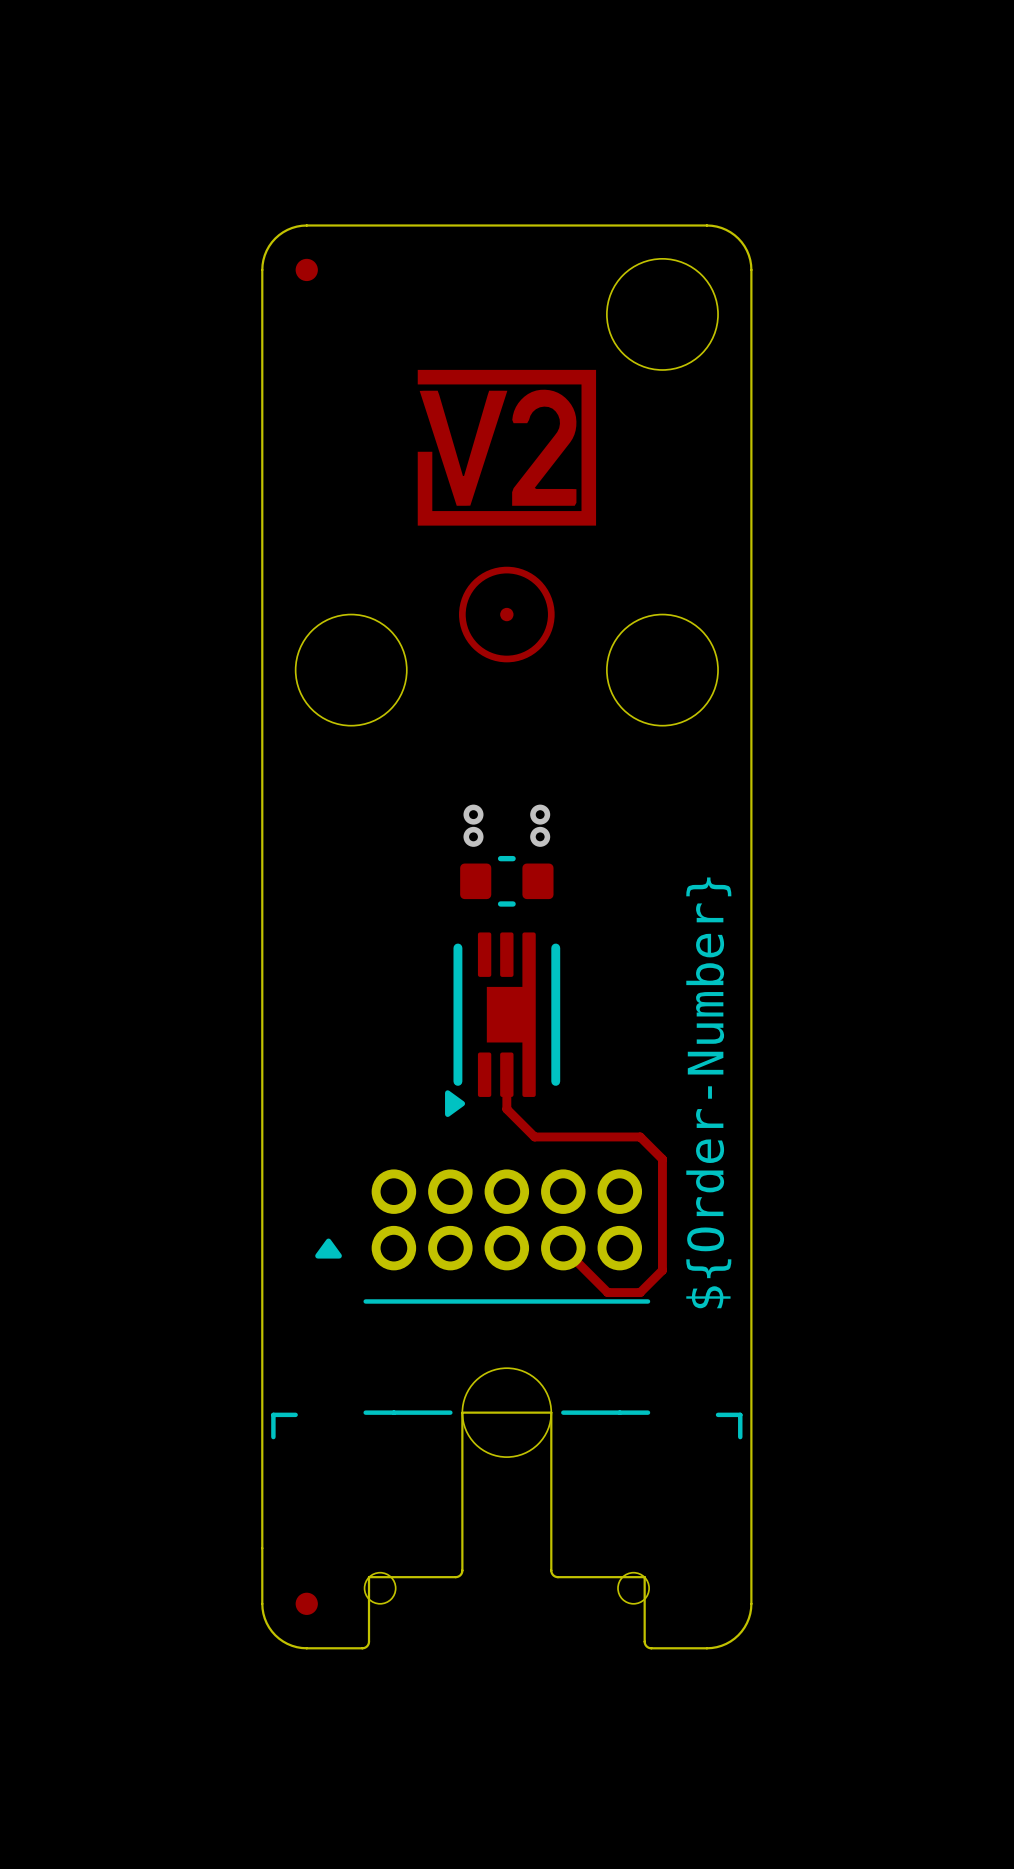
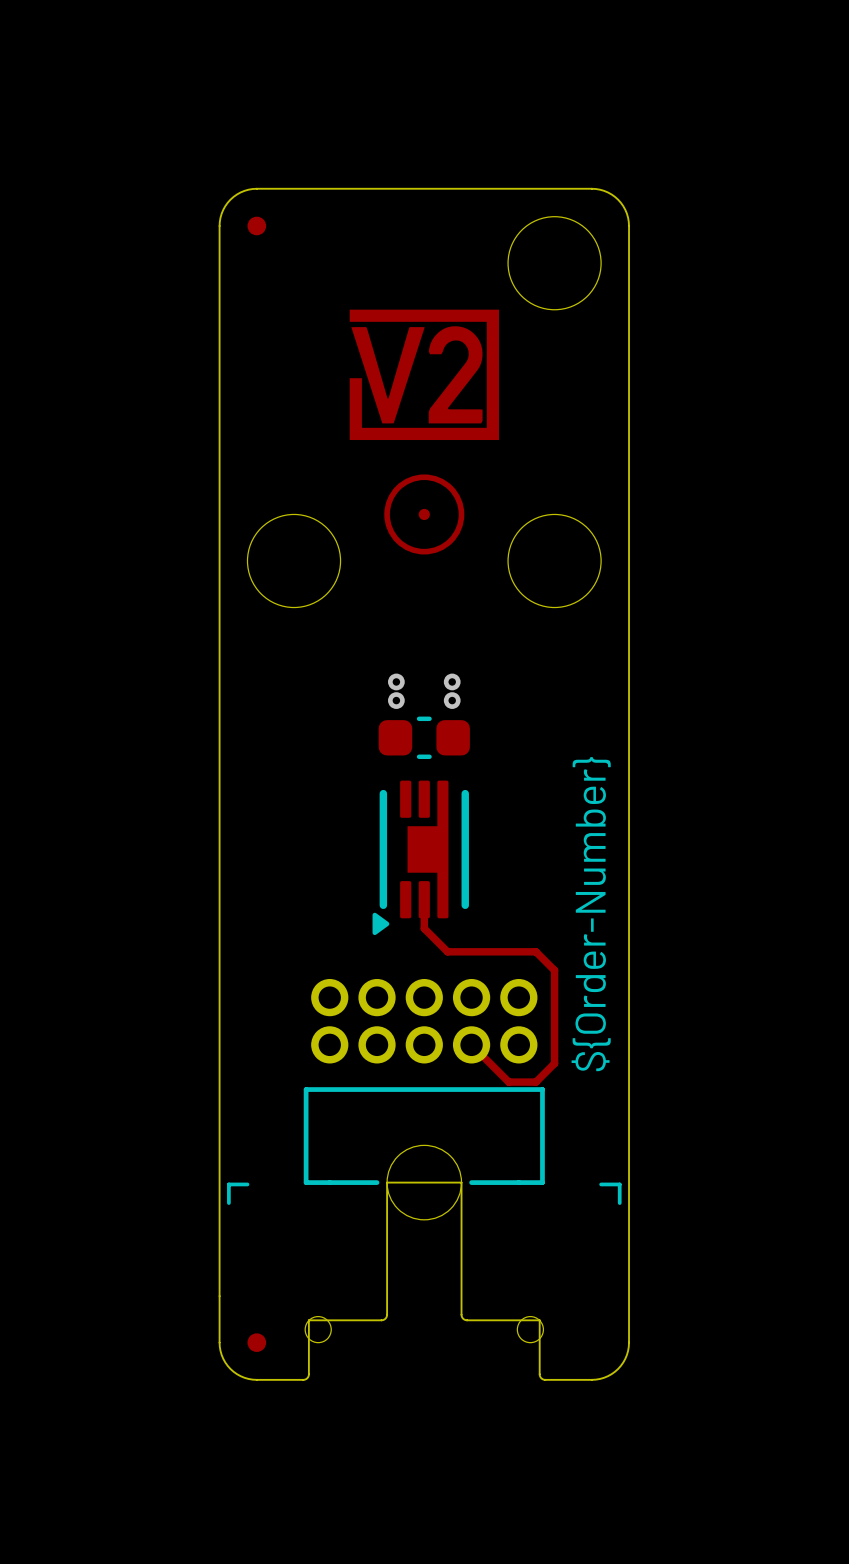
part footprint: [460, 855, 554, 907] -> [378, 716, 470, 760]
part footprint: [315, 1169, 651, 1415] -> [303, 978, 545, 1185]

